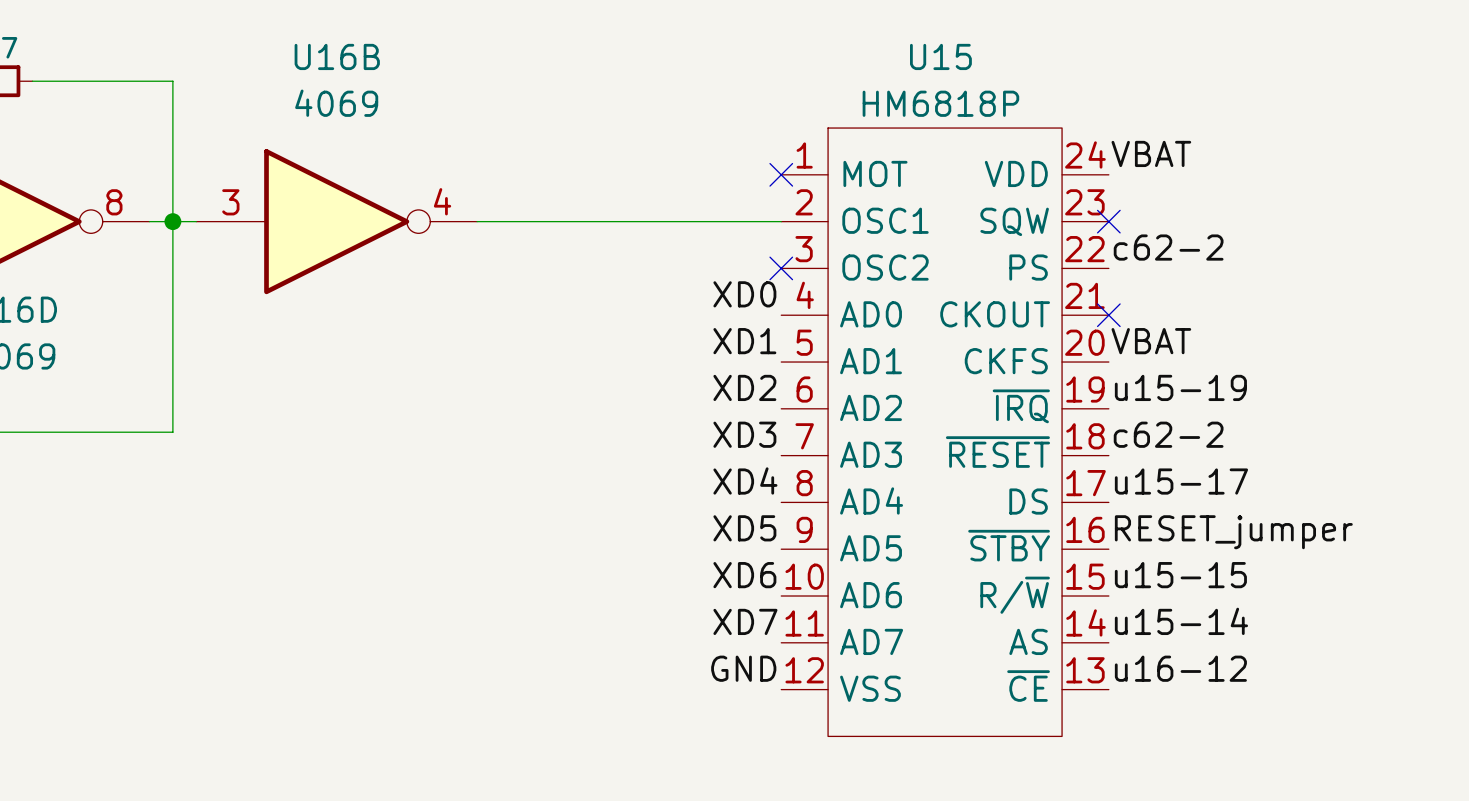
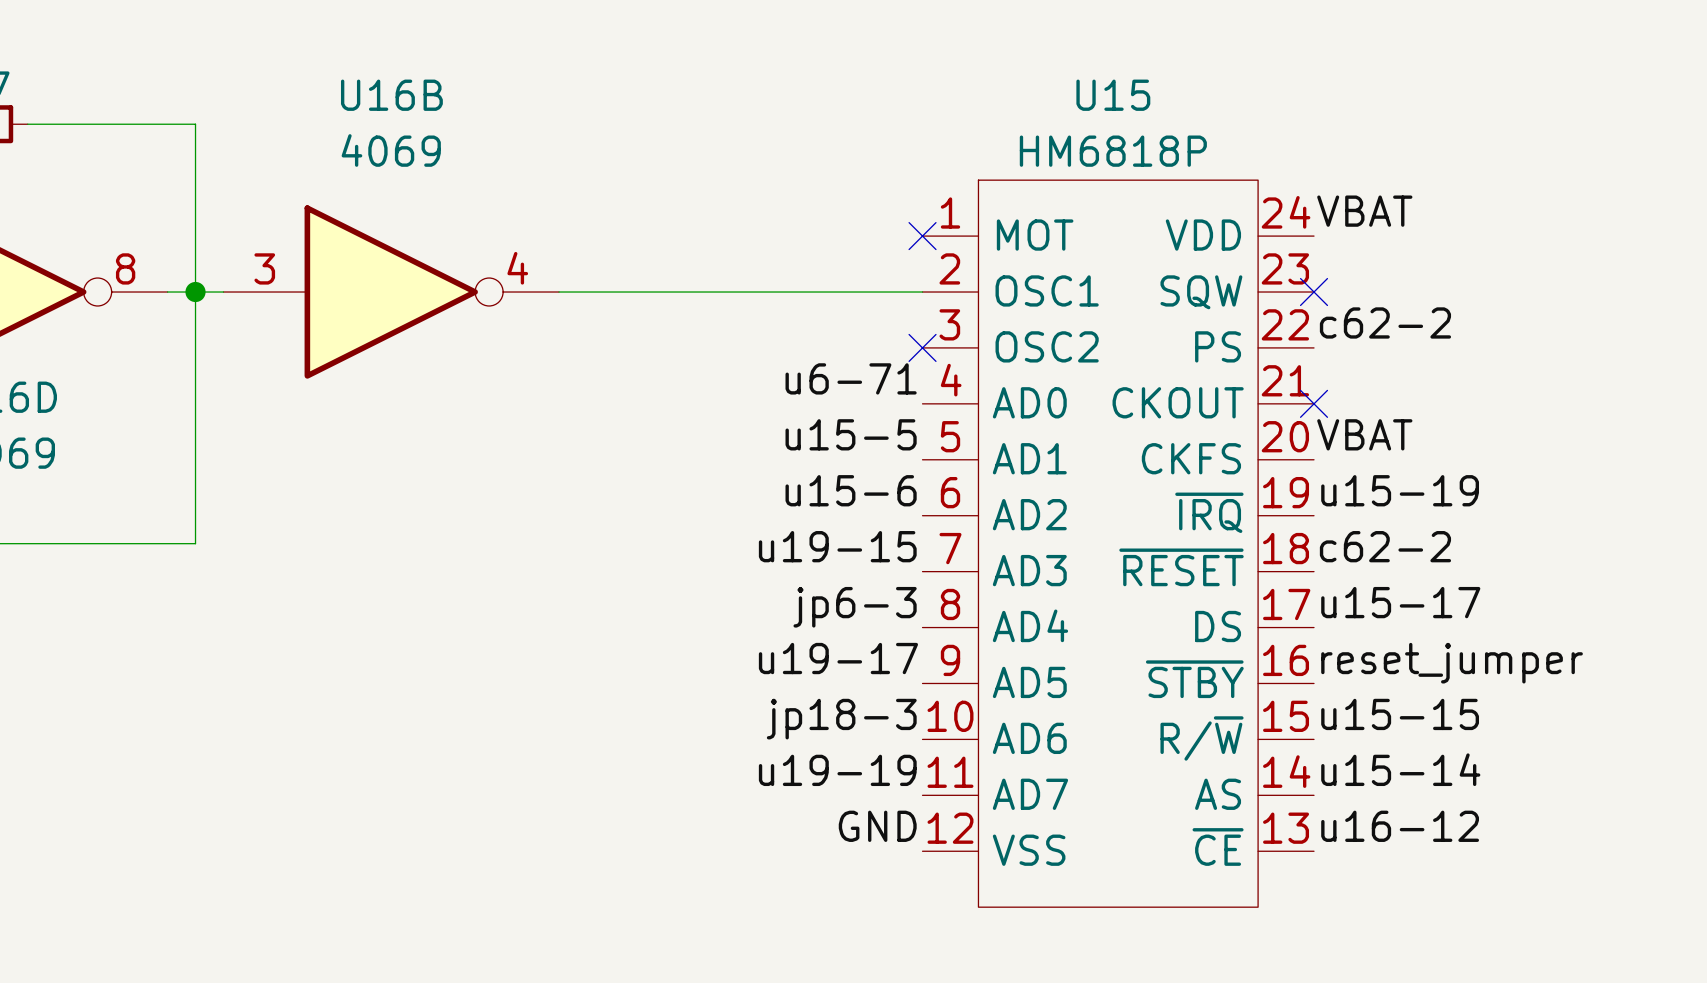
label: XD0 (744, 294) -> u6-71 (851, 378)
label: XD1 (744, 341) -> u15-5 (851, 434)
label: XD2 (744, 387) -> u15-6 (851, 490)
label: XD3 (744, 434) -> u19-15 (837, 546)
label: XD4 (745, 480) -> jp6-3 (855, 607)
label: XD5 (744, 528) -> u19-17 (838, 658)
label: RESET_jumper (1233, 532) -> reset_jumper (1452, 663)
label: XD6 (744, 575) -> jp18-3 (841, 719)
label: XD7 (745, 621) -> u19-19 (837, 770)

